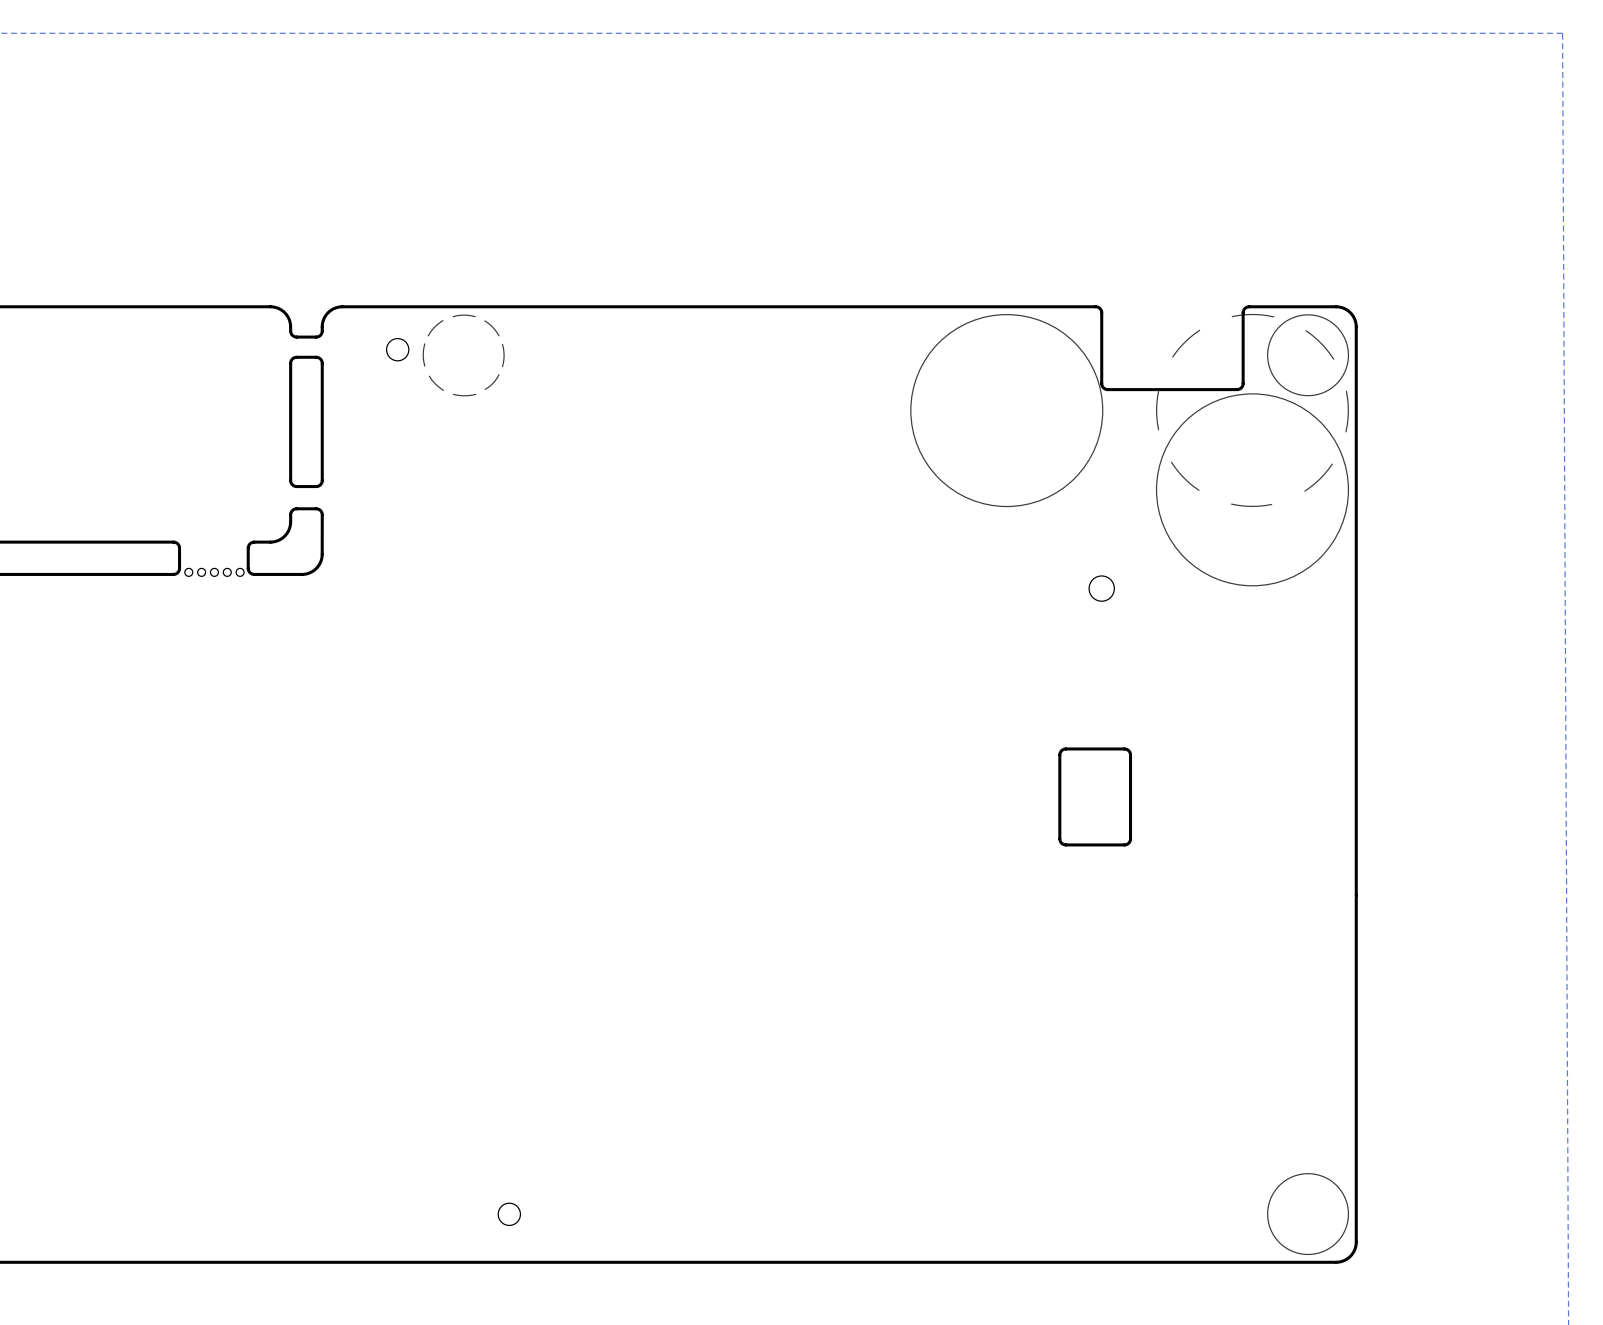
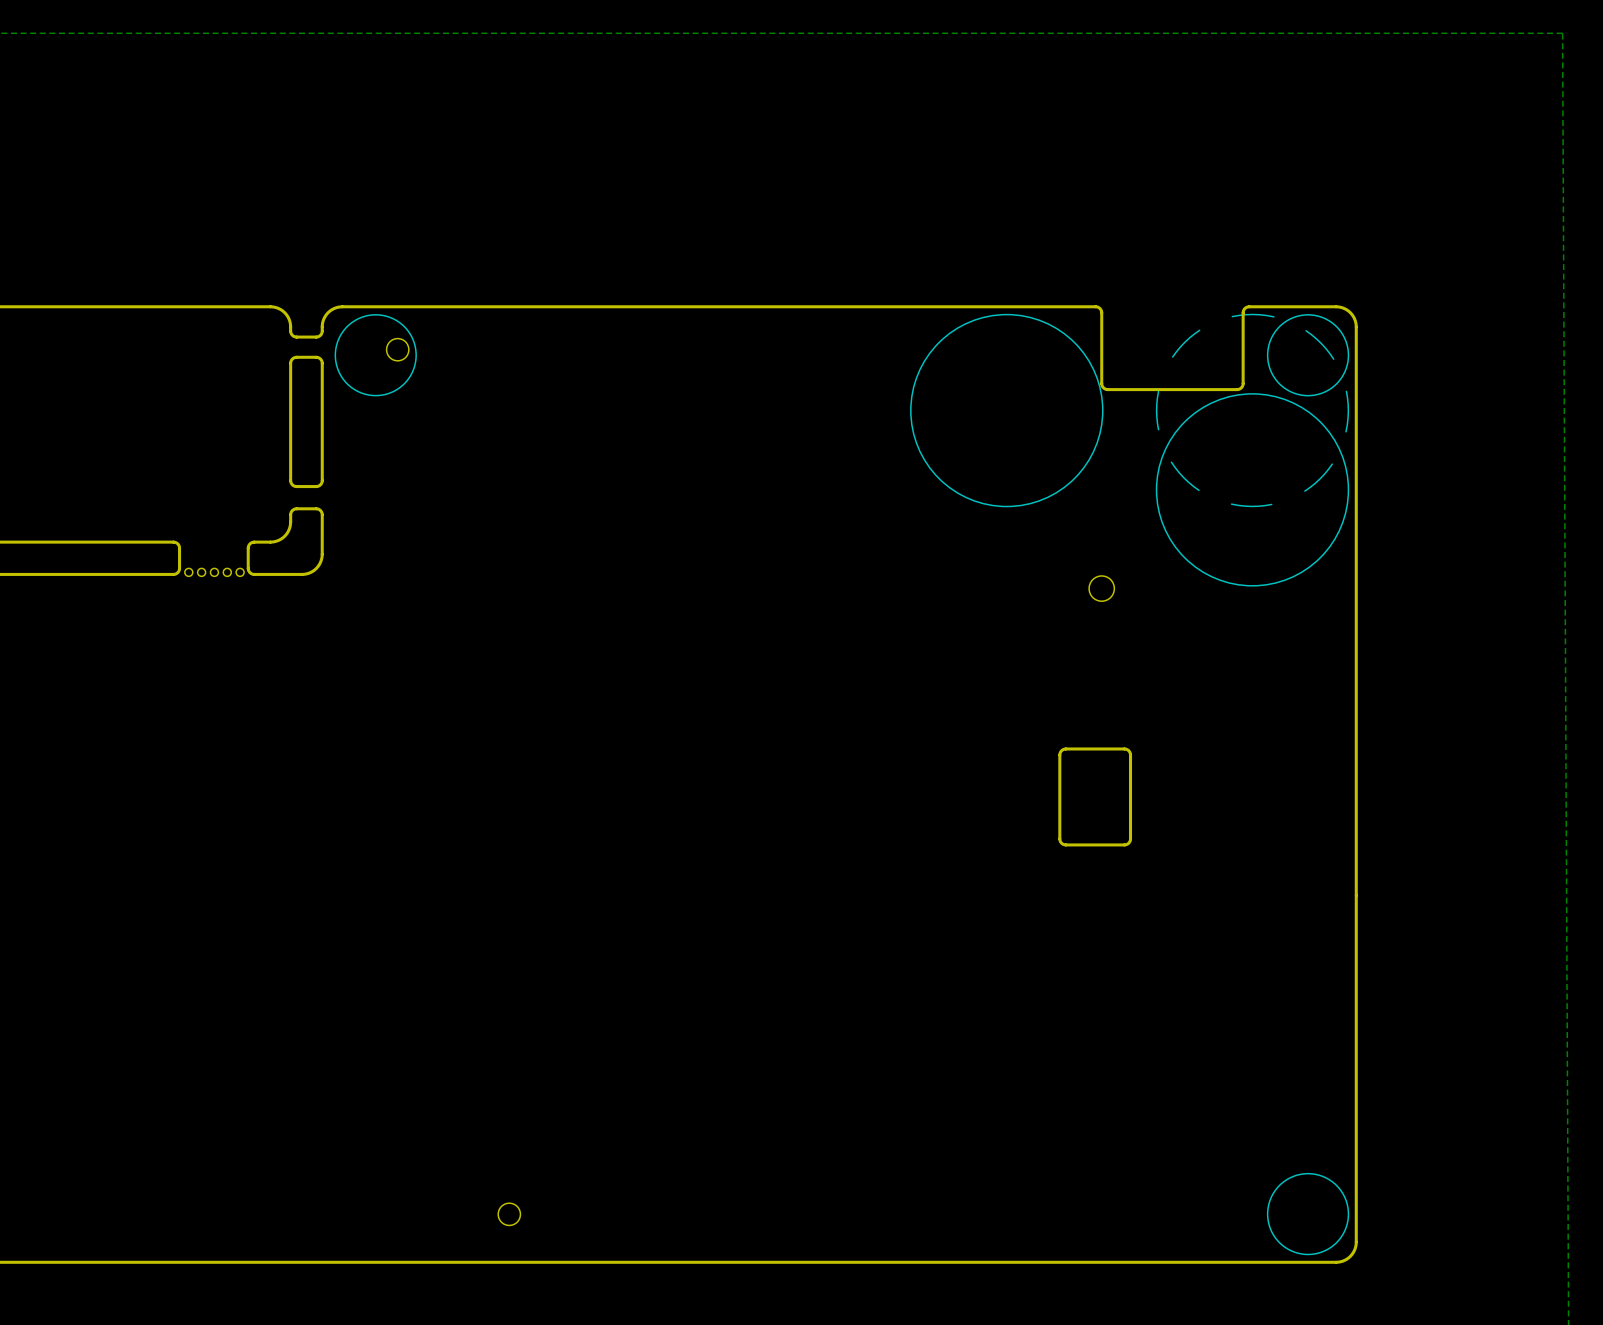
drawing: none -> [334, 314, 417, 397]
line: (475, 316) (464, 315) (453, 316) -> none
line: (442, 320) (428, 335) -> none
line: (484, 320) (498, 335) -> none
line: (424, 343) (423, 355) (424, 366) -> none
line: (502, 344) (504, 355) (502, 366) -> none
line: (498, 374) (485, 389) -> none
line: (429, 376) (443, 390) -> none
line: (475, 394) (453, 394) -> none

